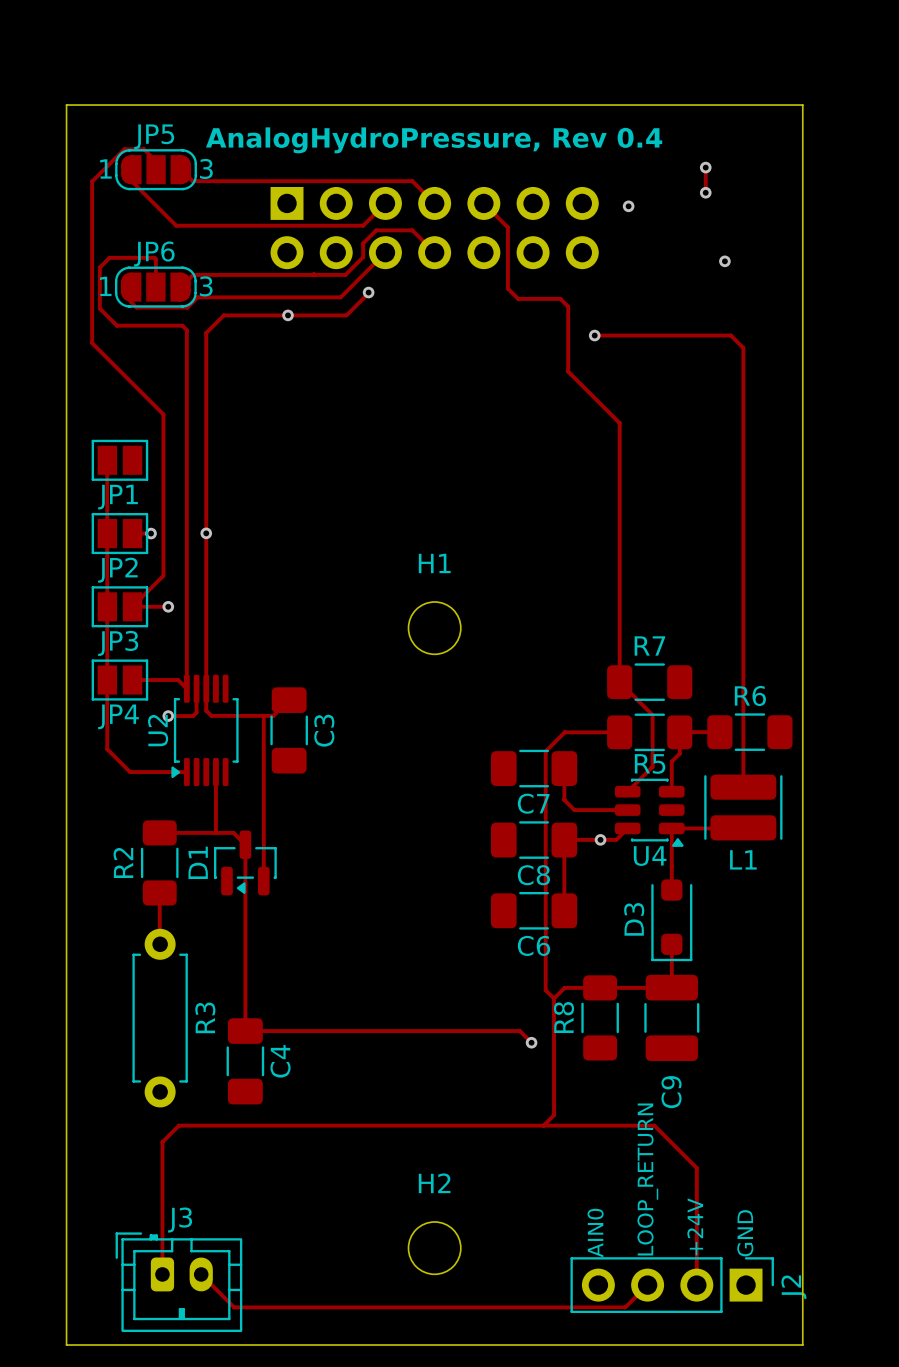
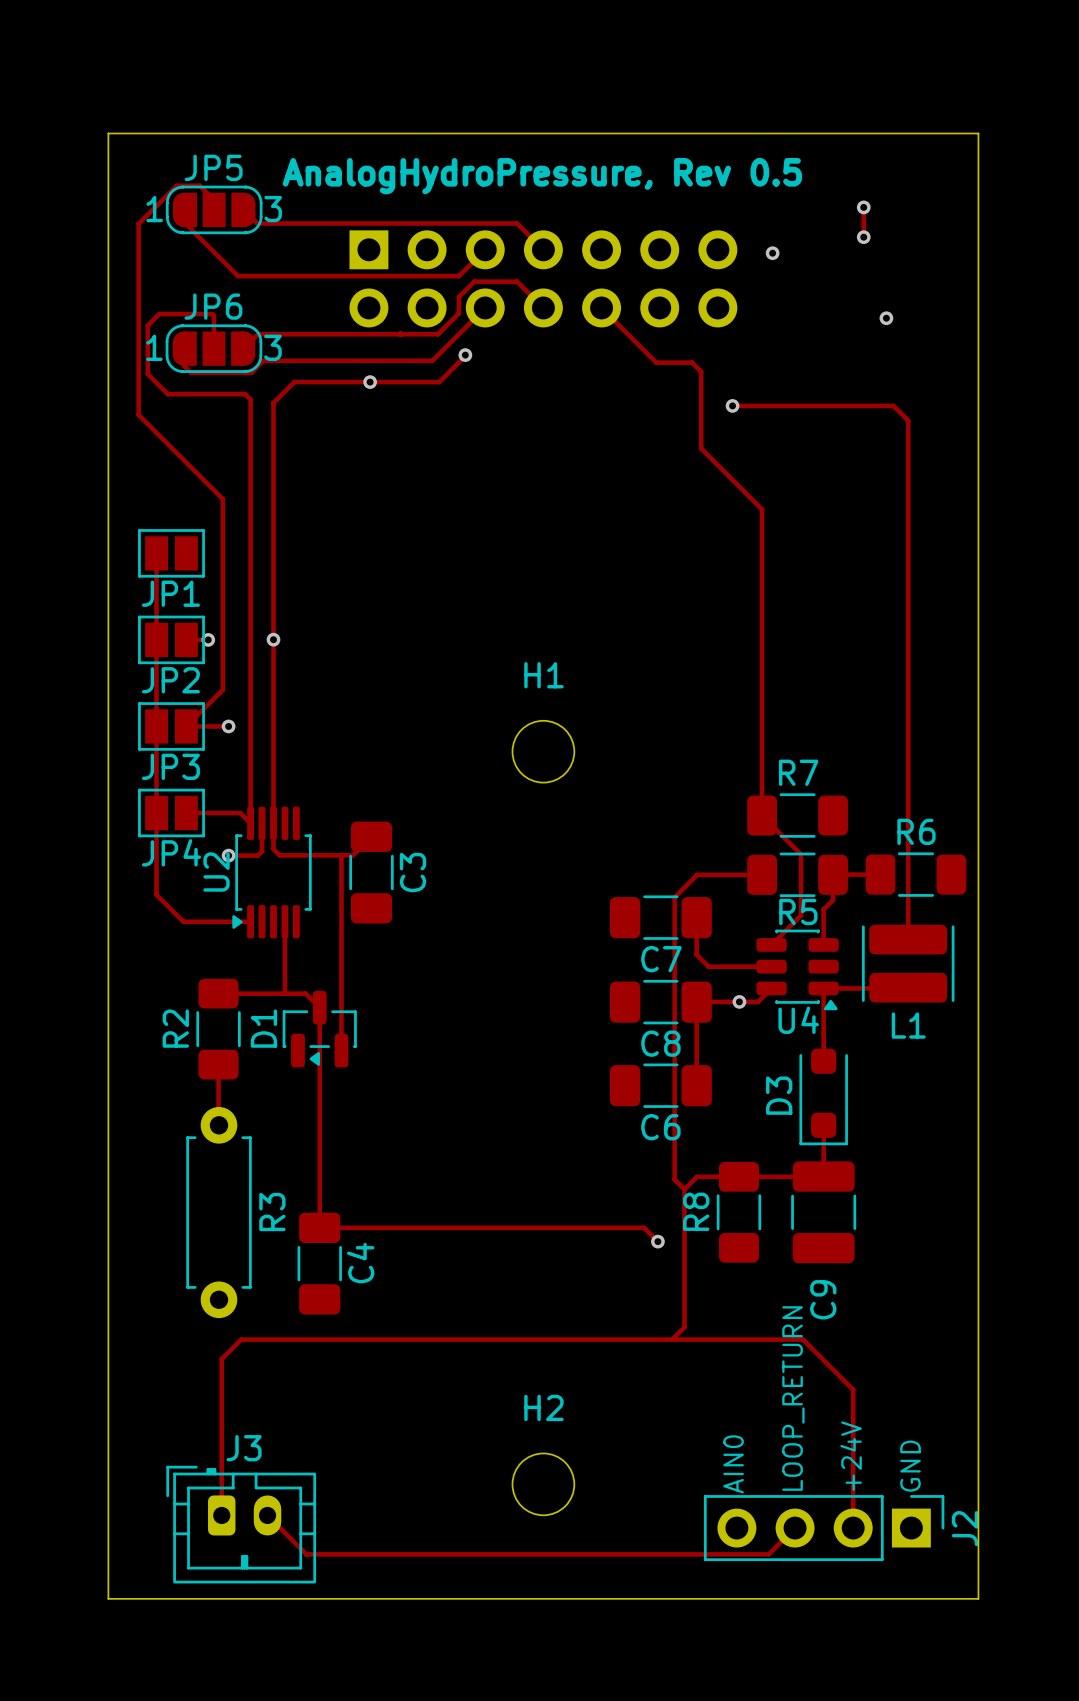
text: AnalogHydroPressure, Rev 0.4 (434, 140) -> AnalogHydroPressure, Rev 0.5 (542, 176)
track: (483, 203) (507, 227) (507, 288) (518, 298) (530, 298) -> (601, 307) (656, 362)

